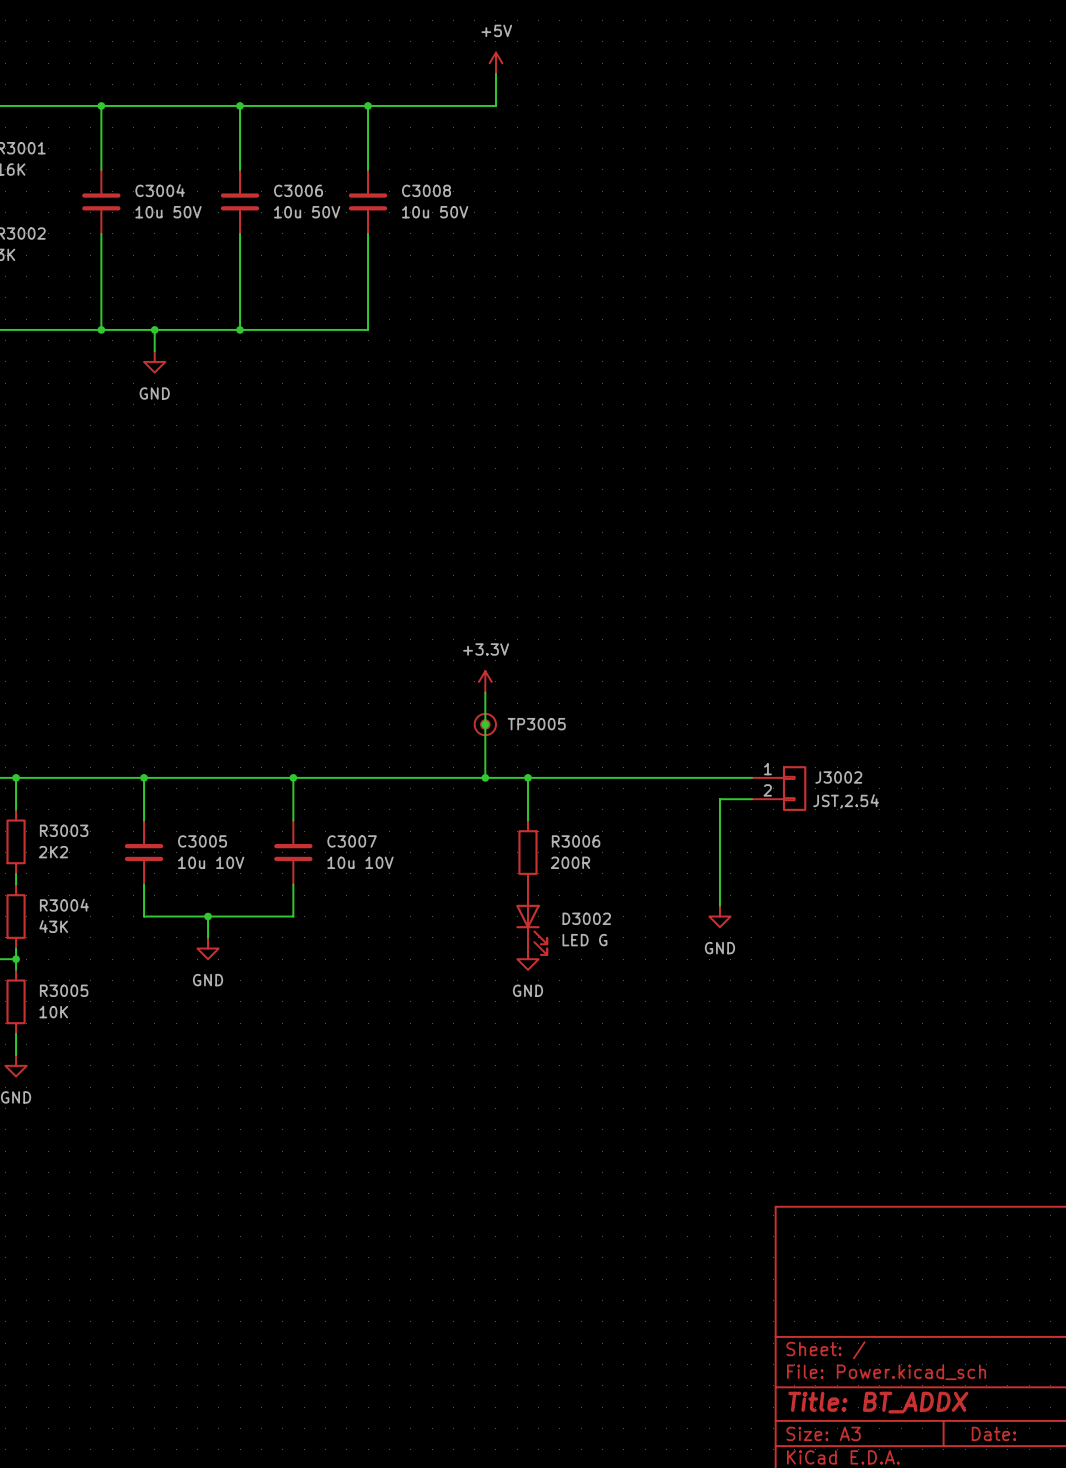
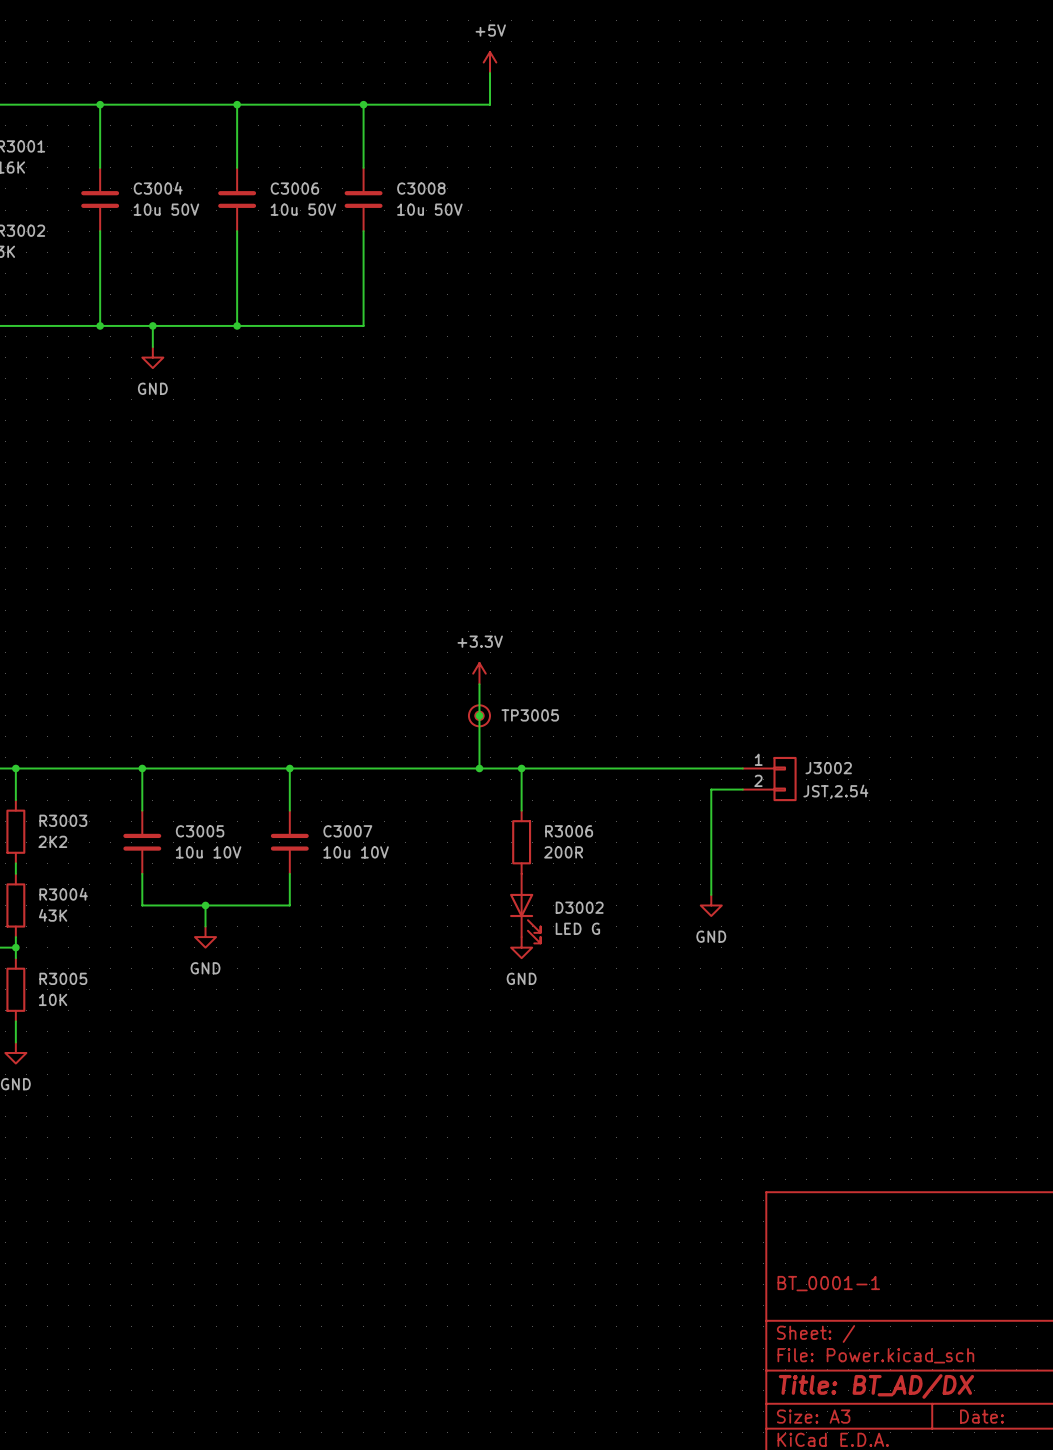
title block: none -> BT_0001-1 (828, 1283)
title block: Title: BT_ADDX (878, 1402) -> Title: BT_AD/DX (876, 1386)

